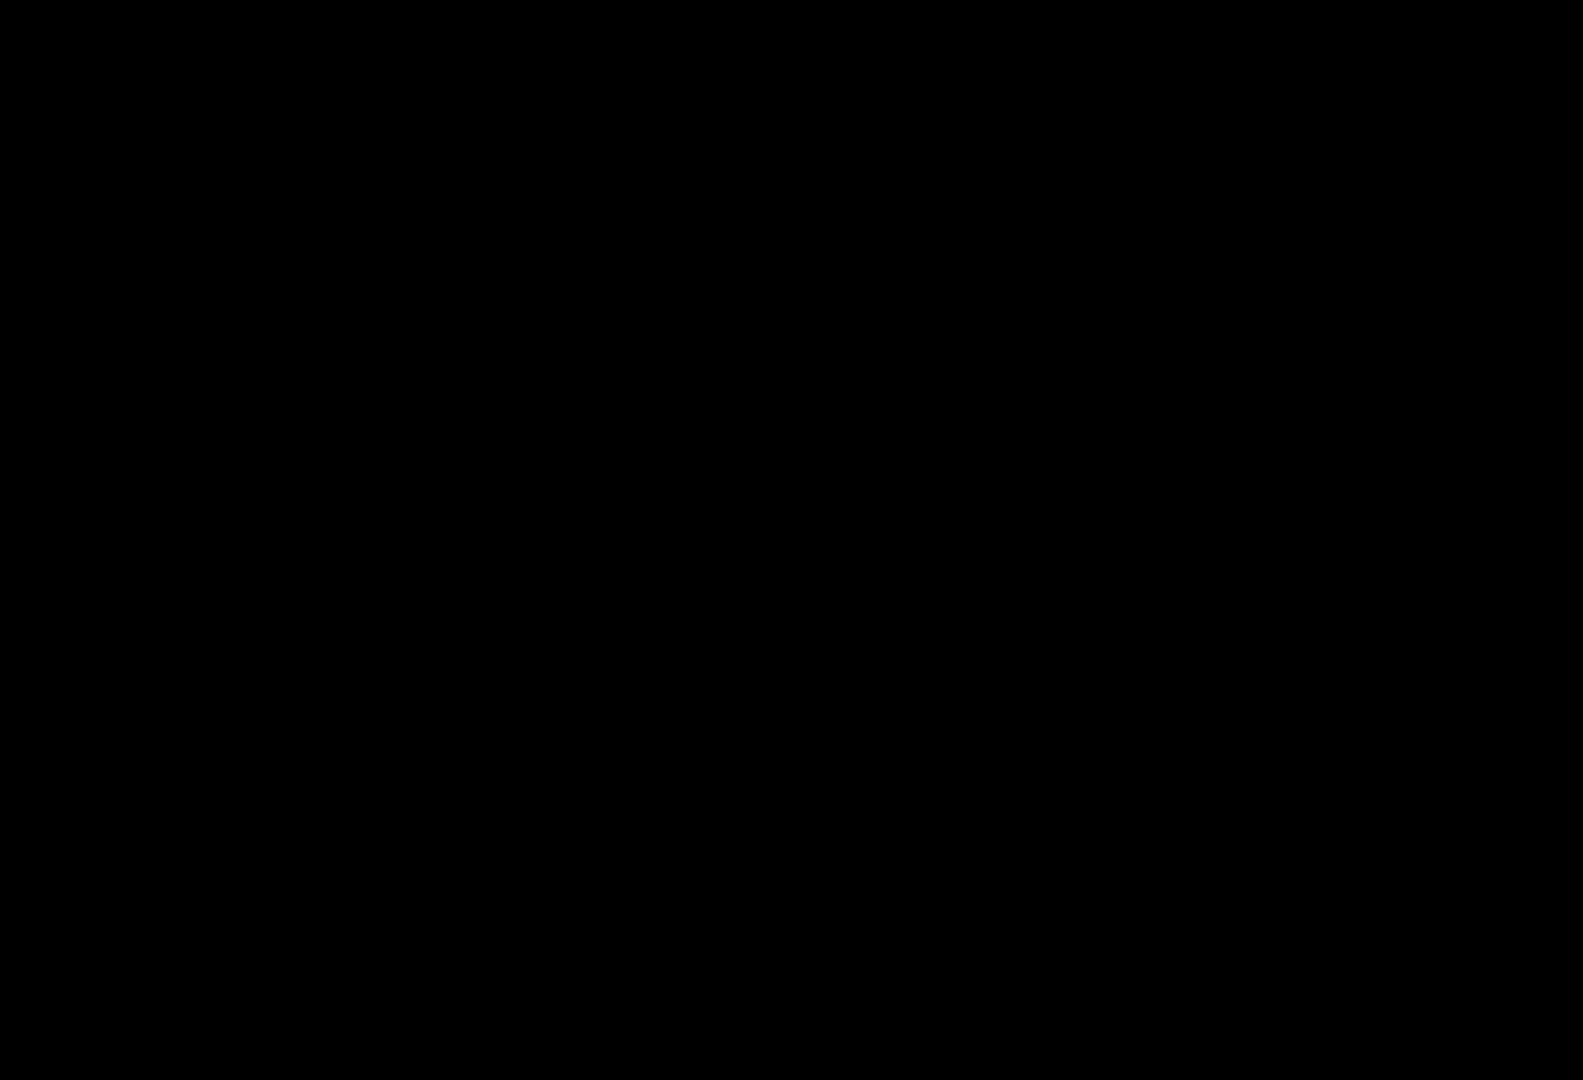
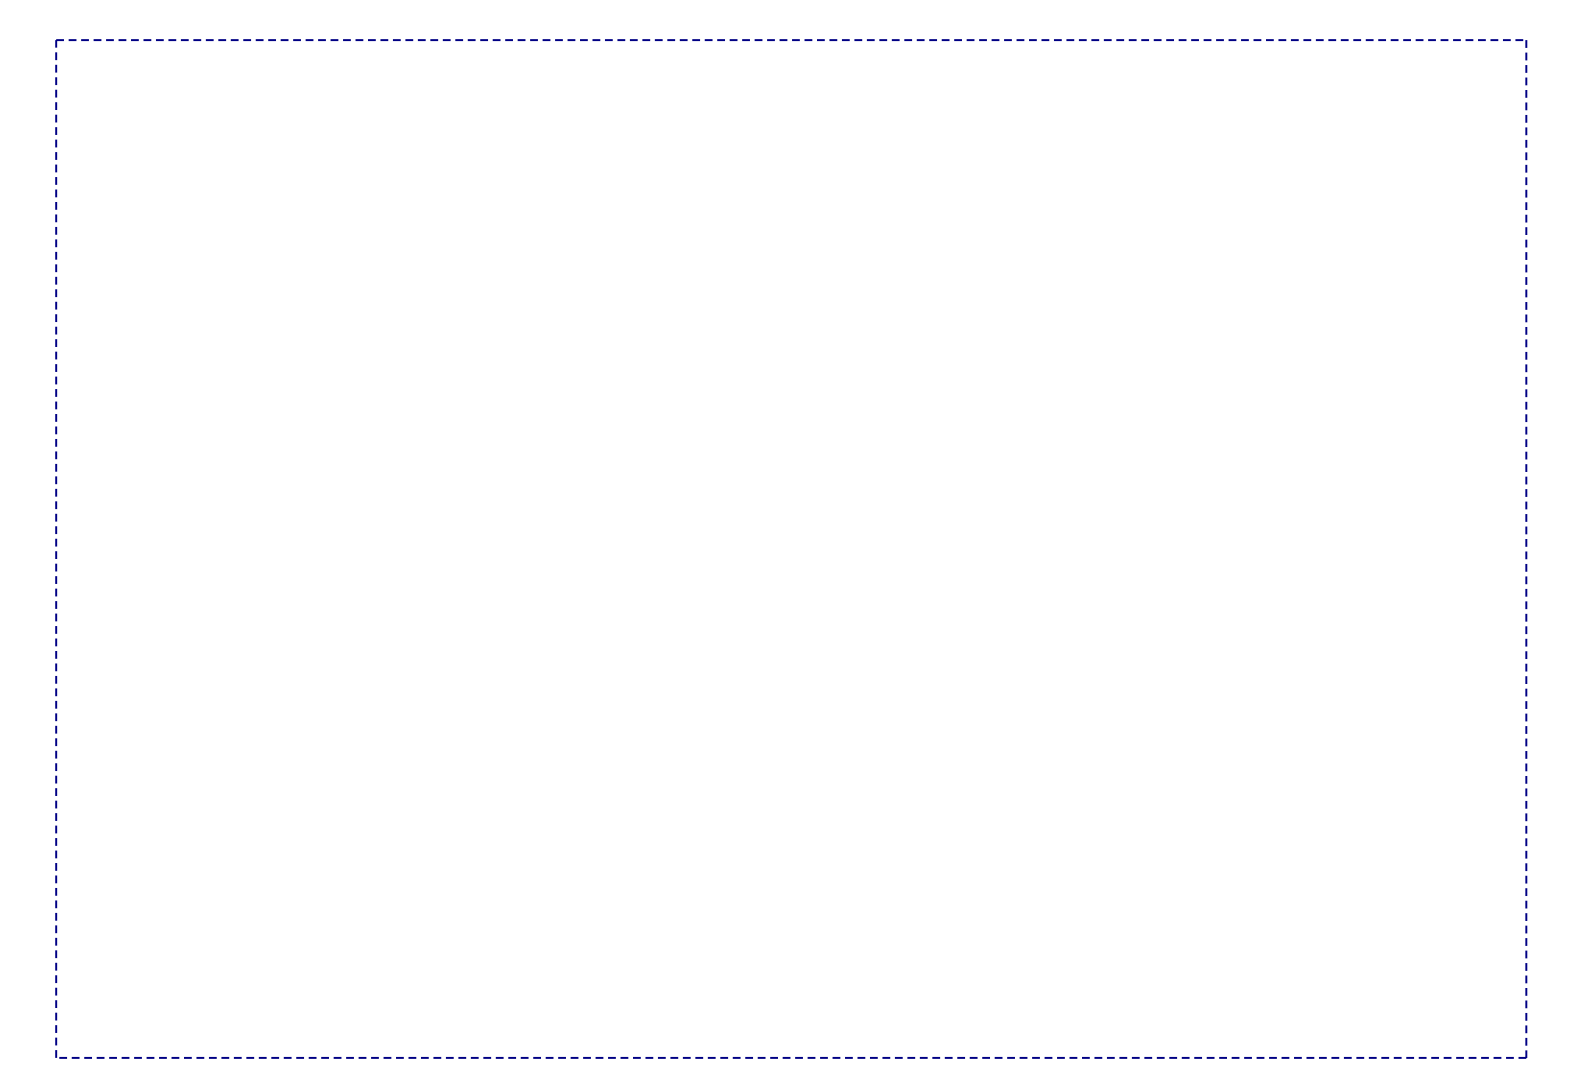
line: none -> (56, 40) (56, 1057) (1526, 1057) (1526, 40) (56, 40)

